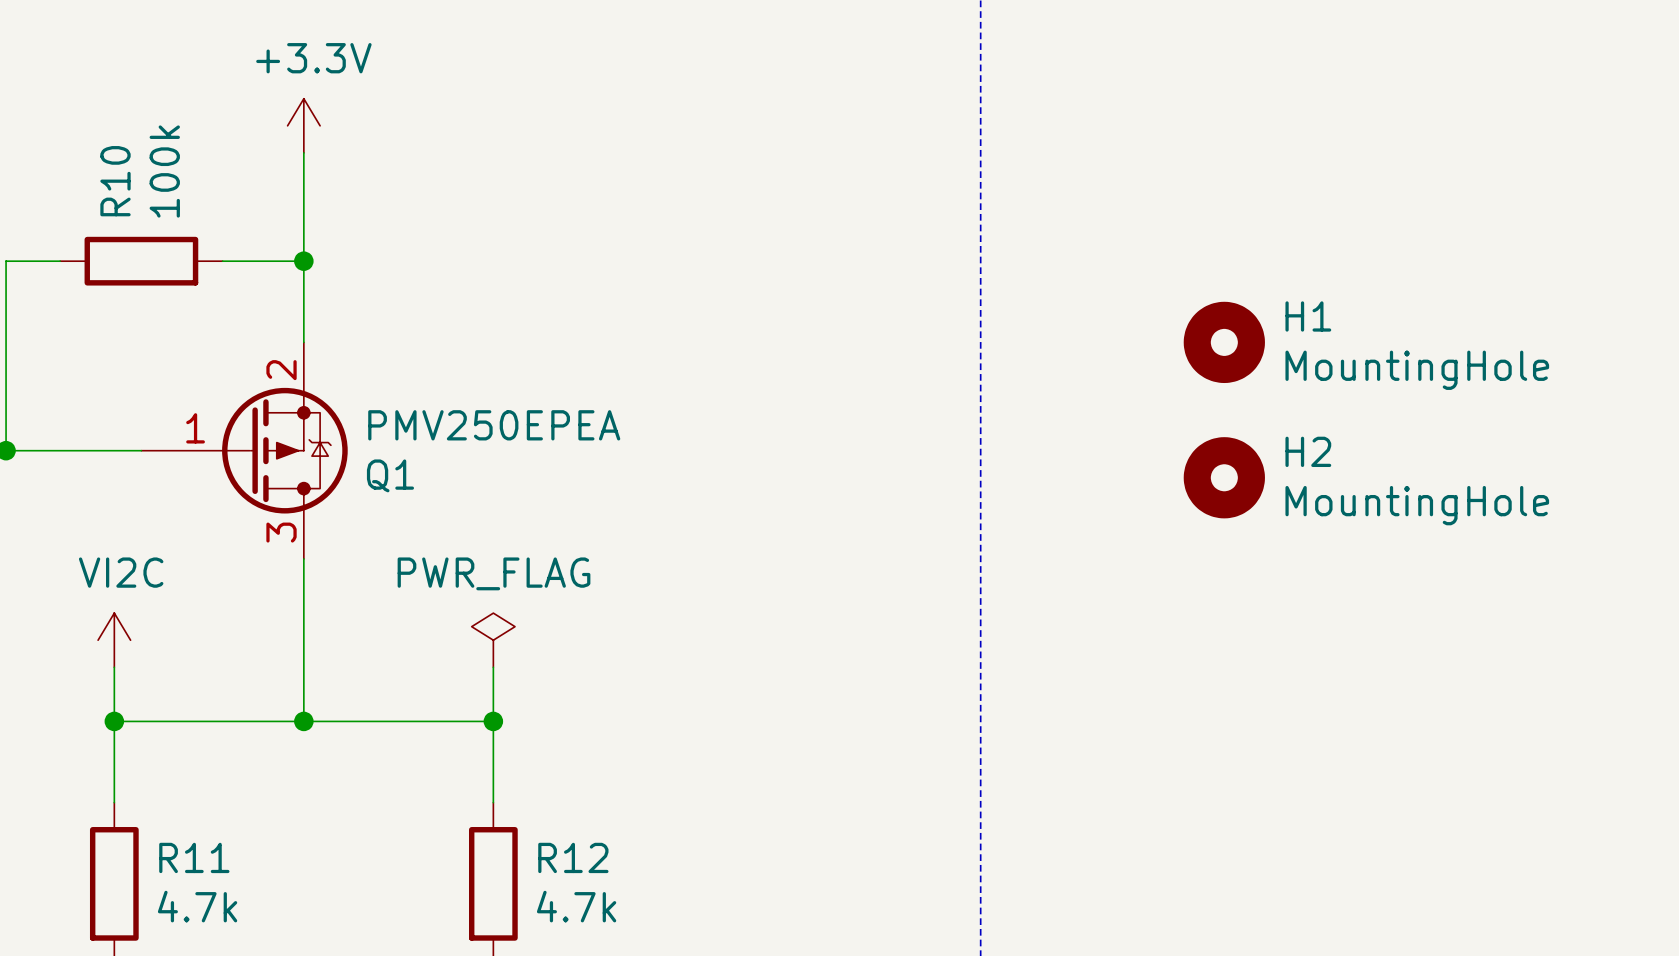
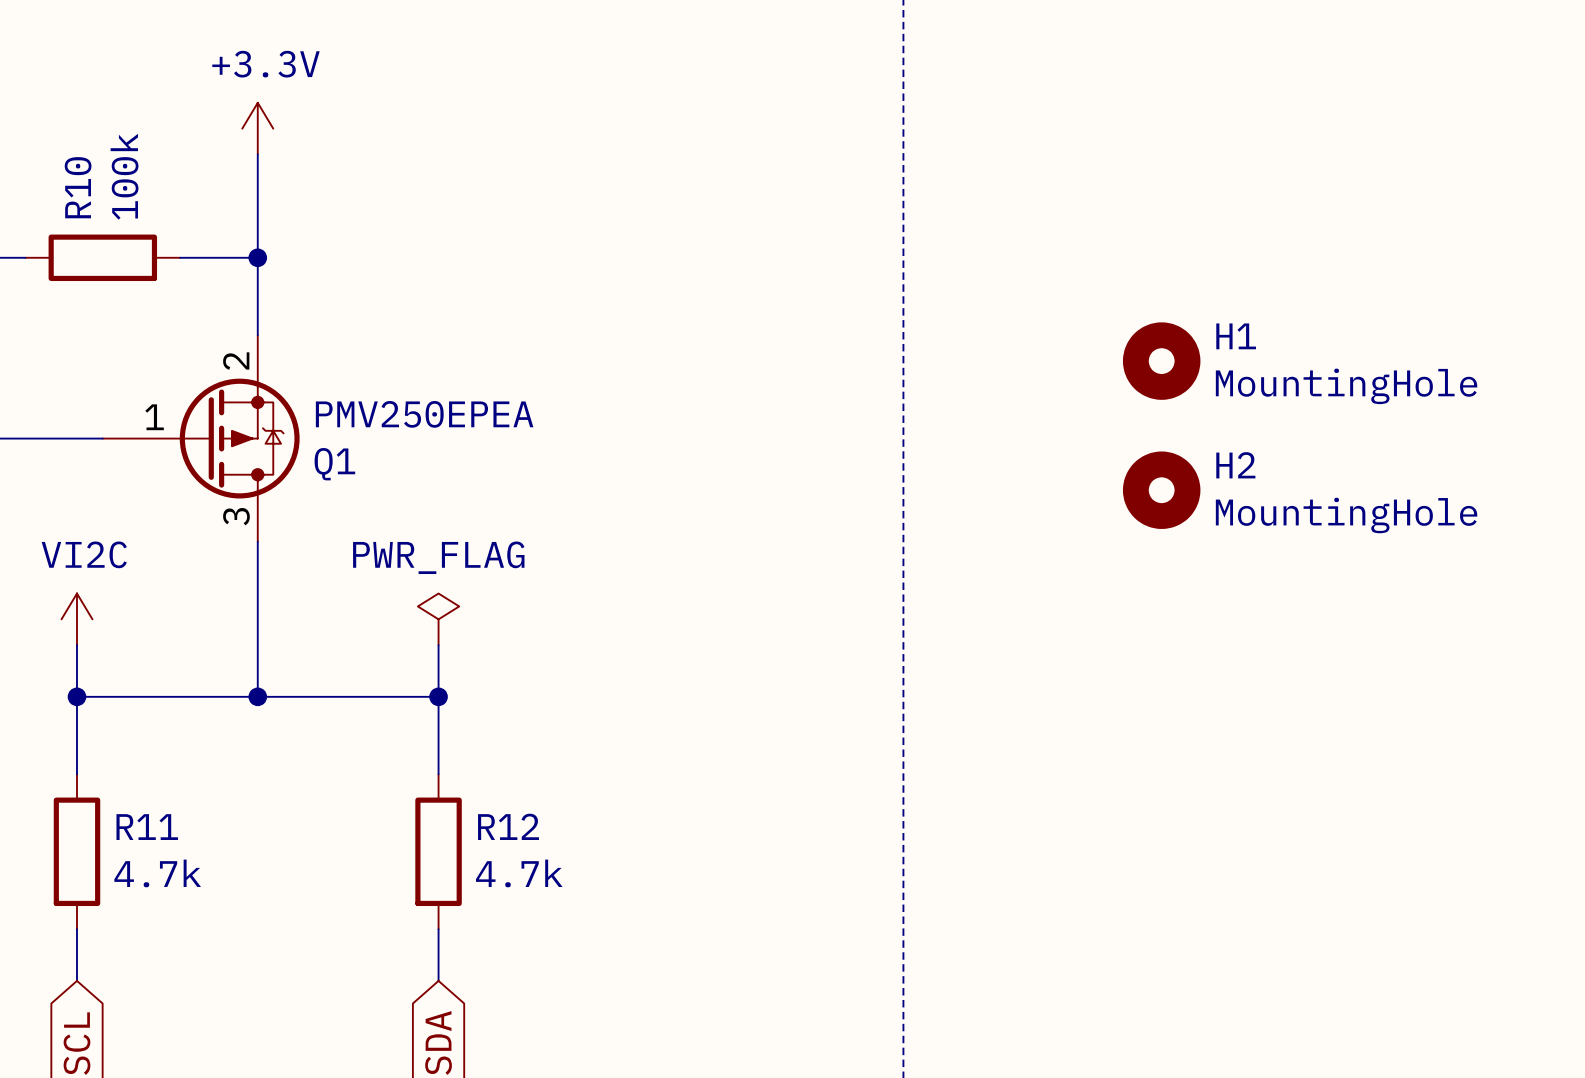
H1 position: (1224, 342) -> (1161, 361)
H2 position: (1224, 477) -> (1161, 490)

